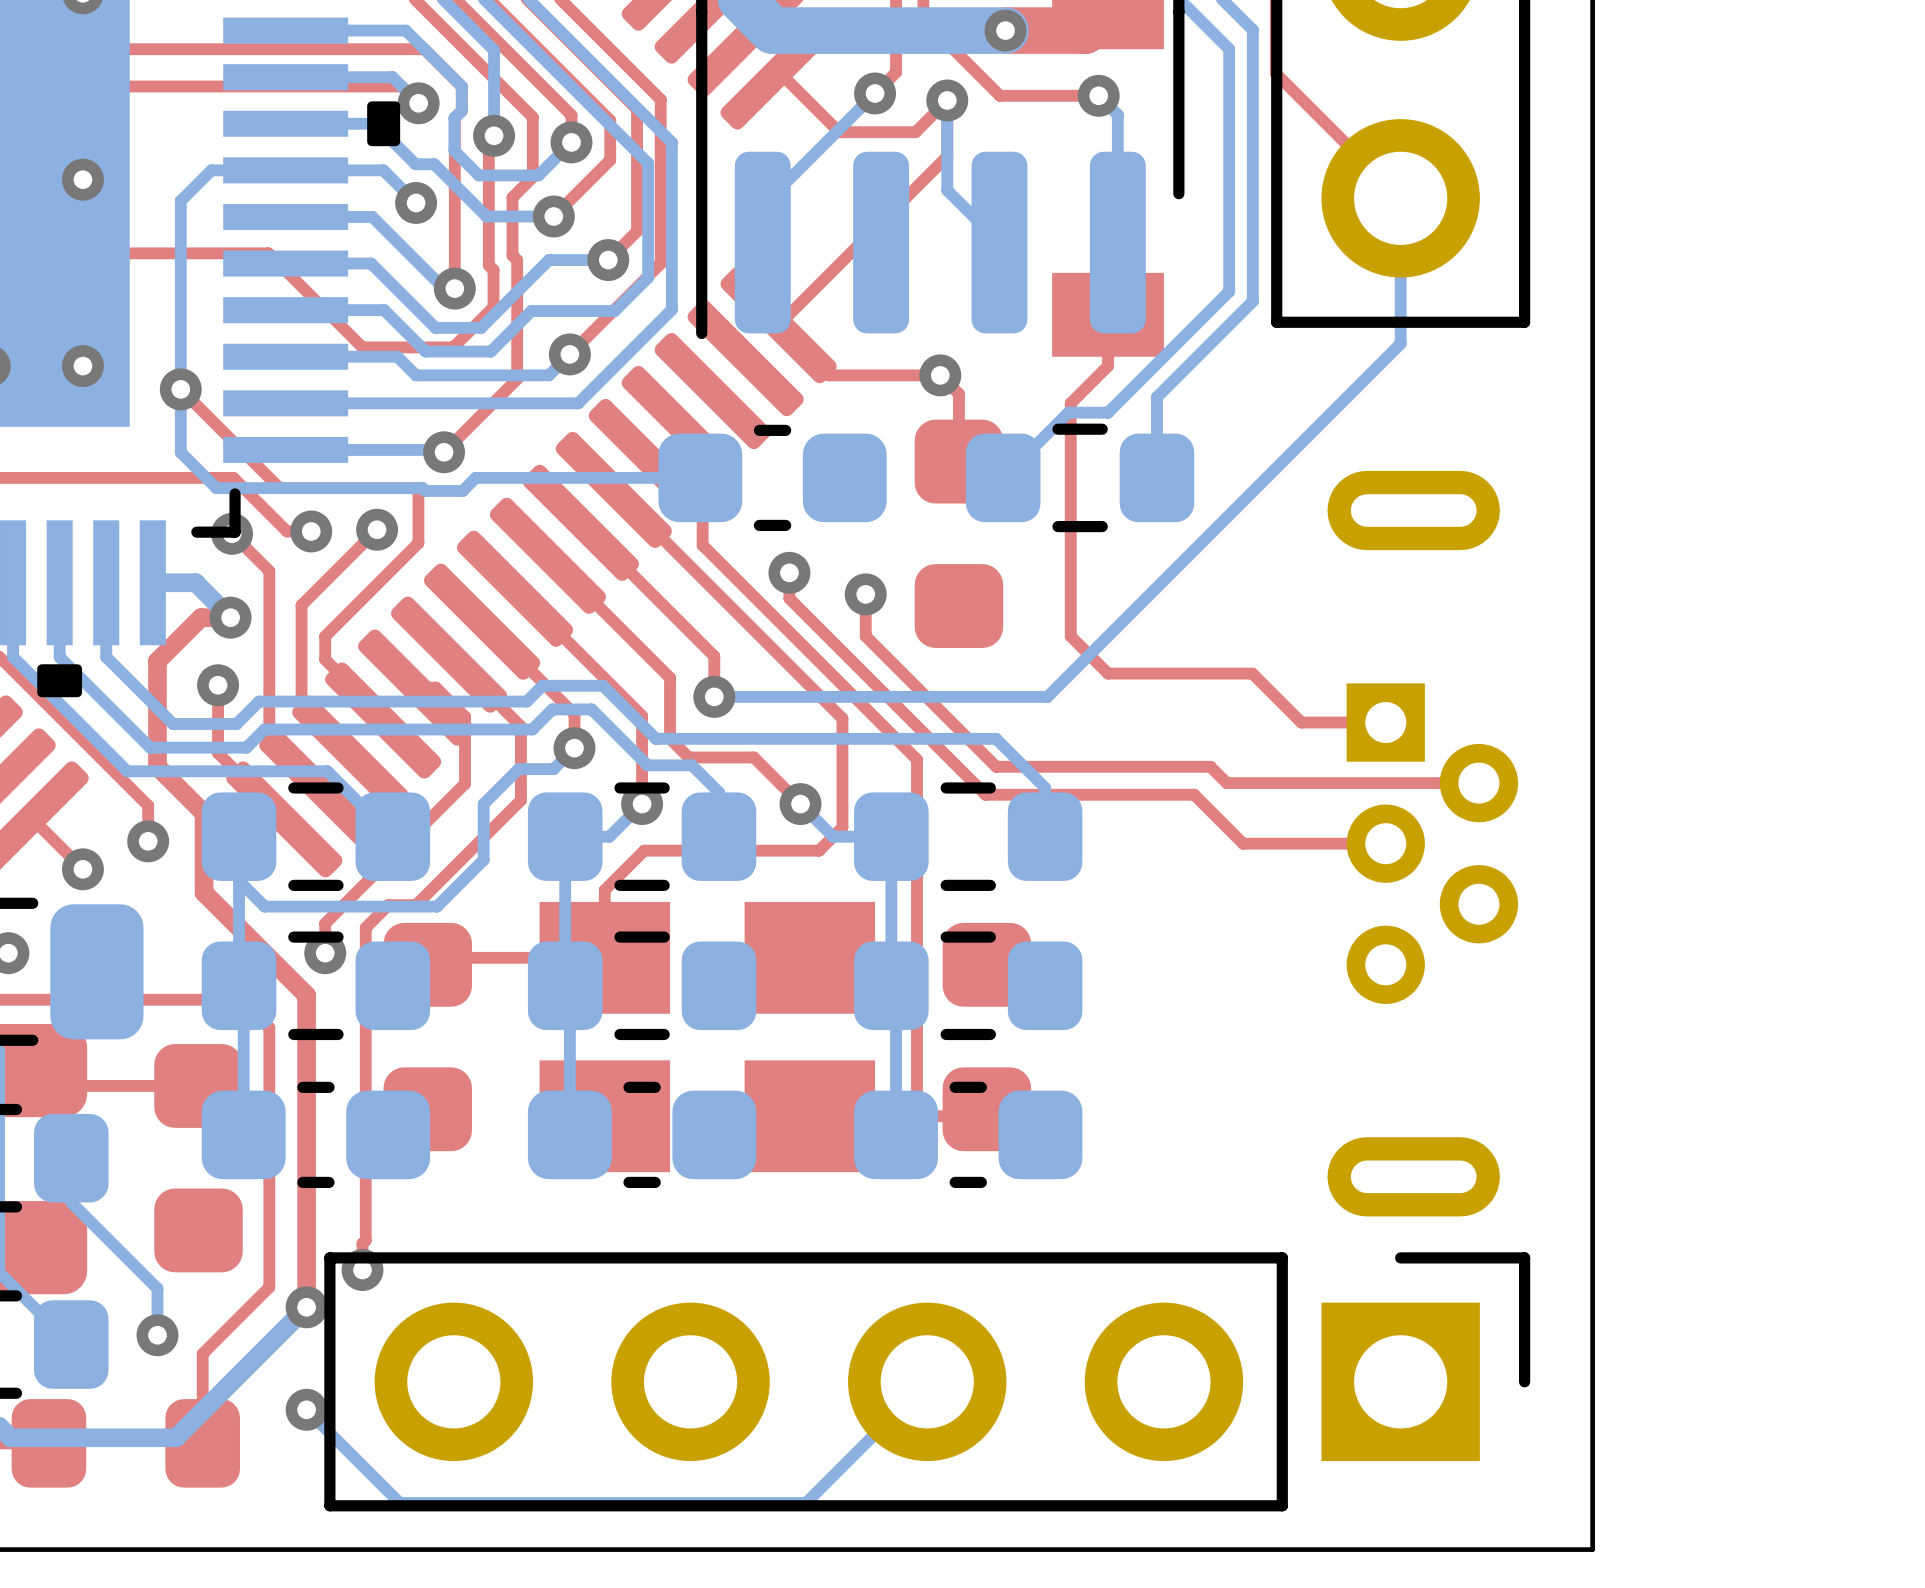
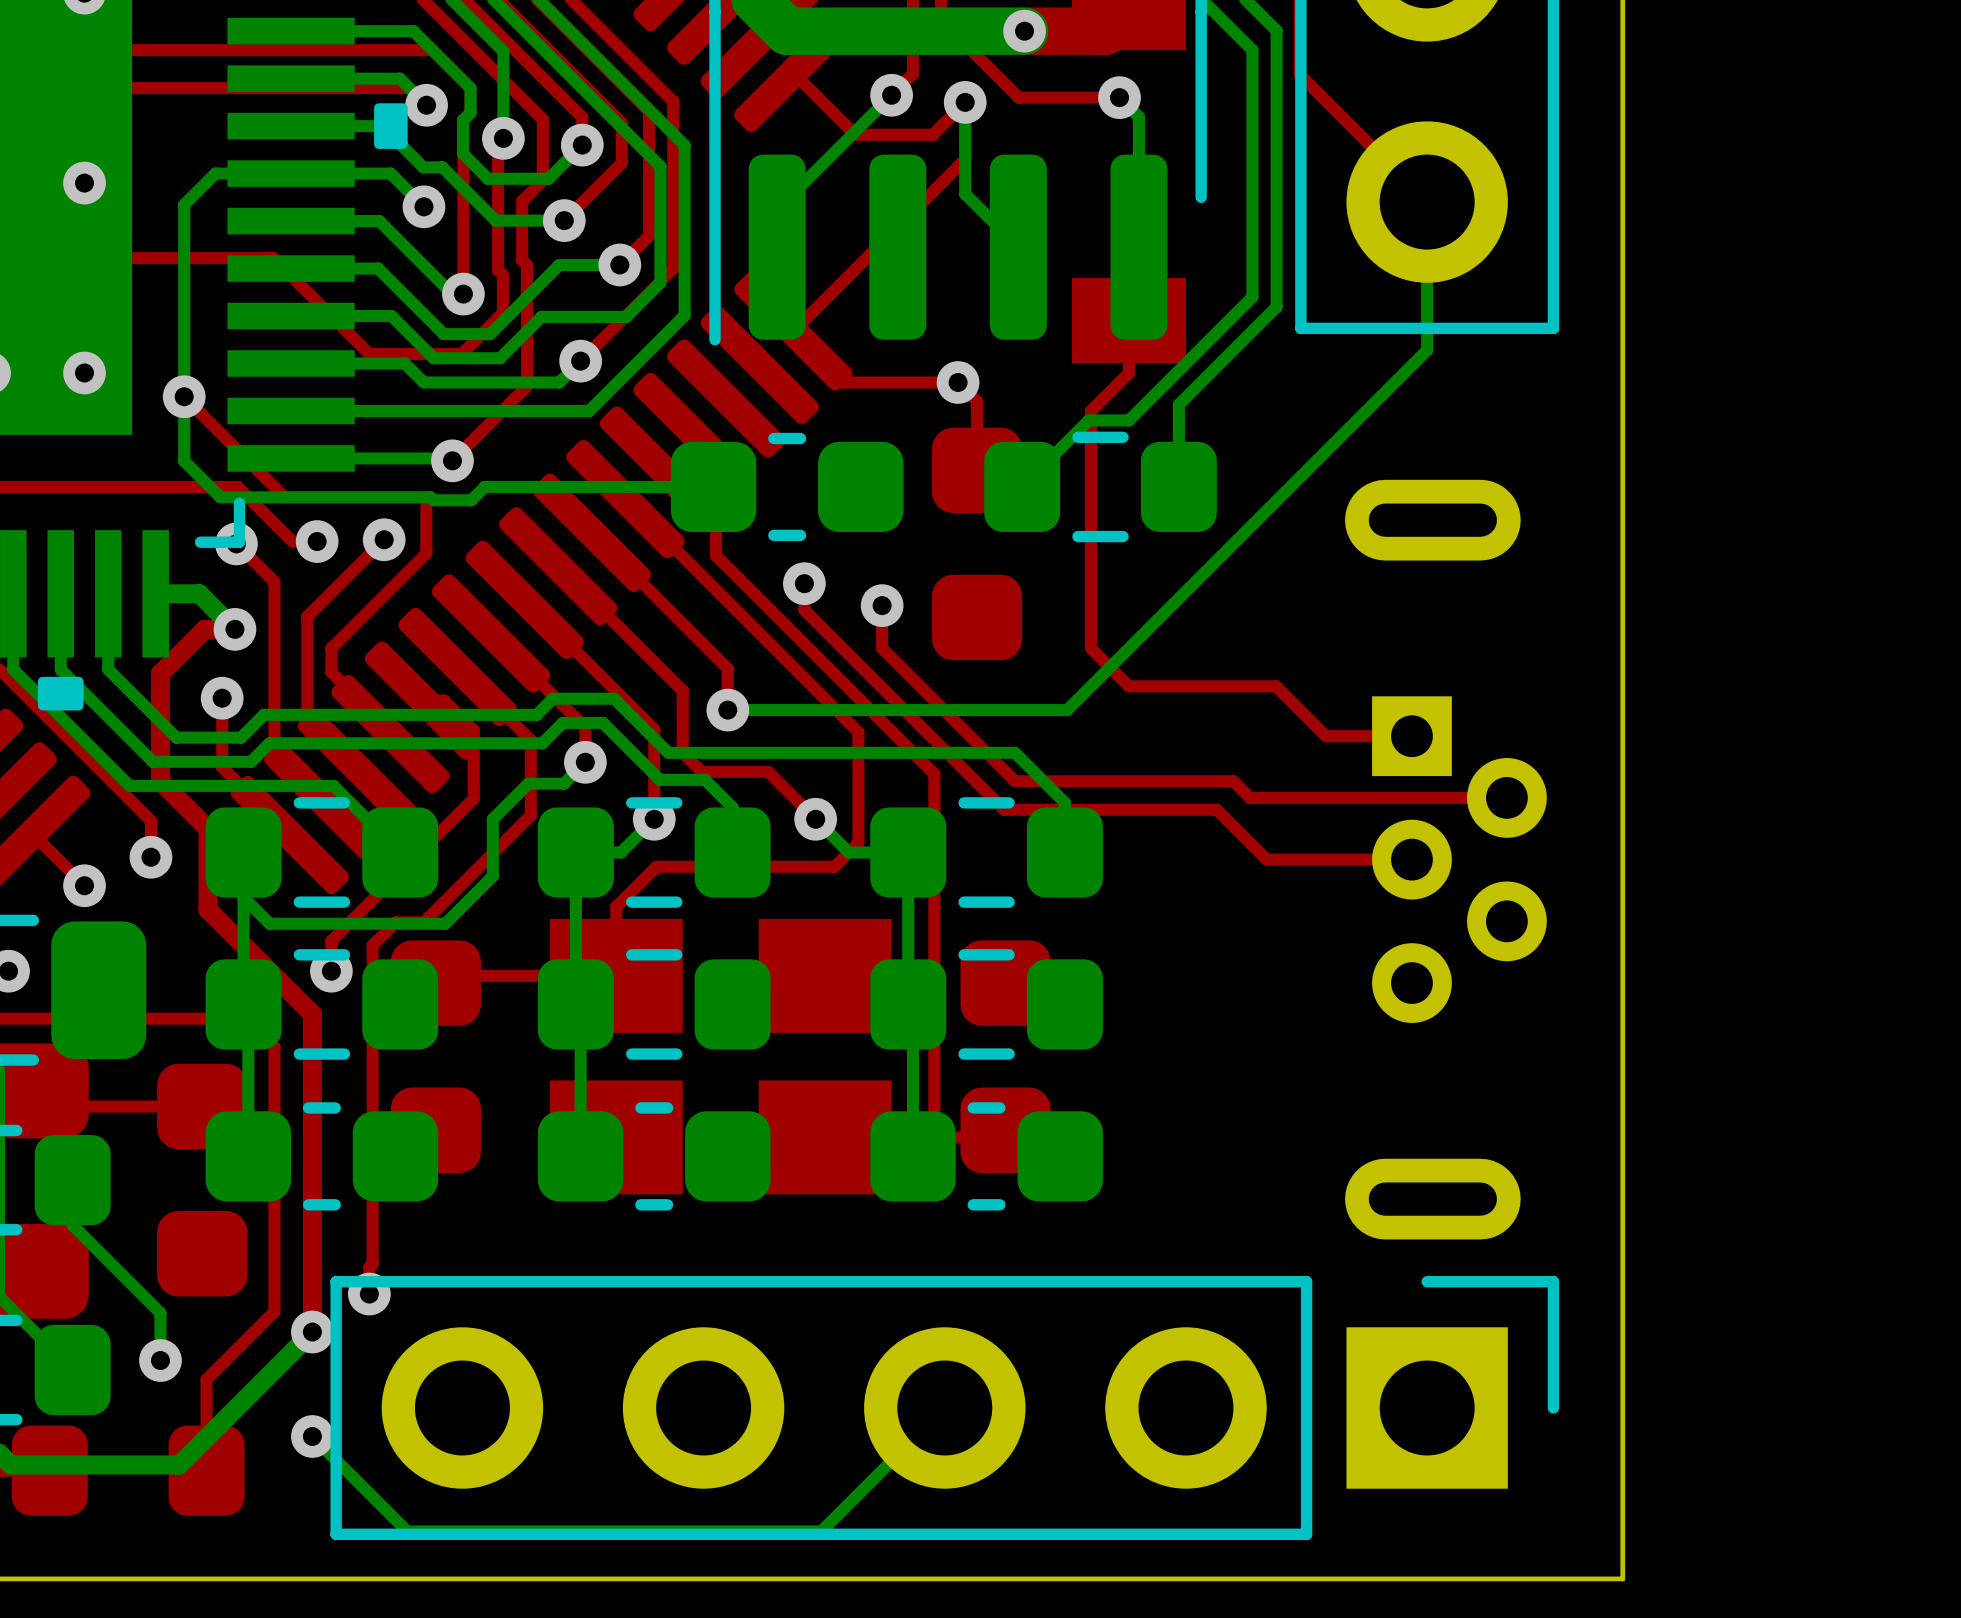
part footprint: [1327, 470, 1519, 1217] -> [1345, 479, 1547, 1240]

